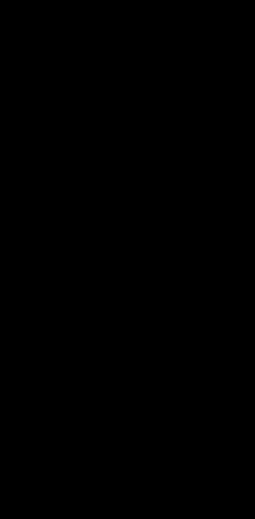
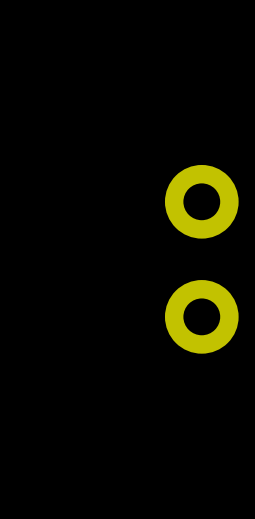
part: none -> (201, 259)

